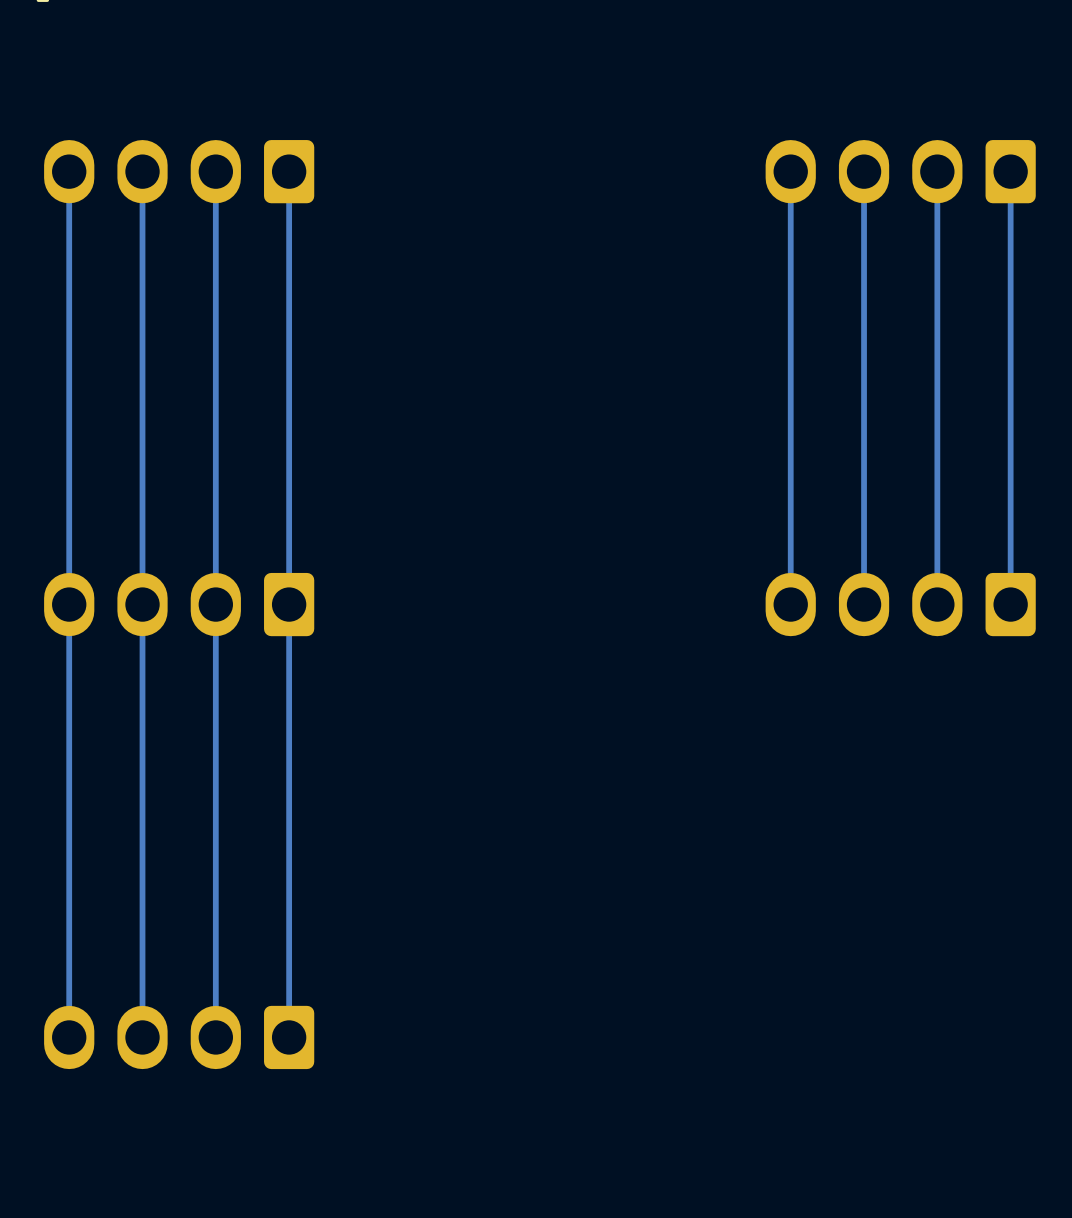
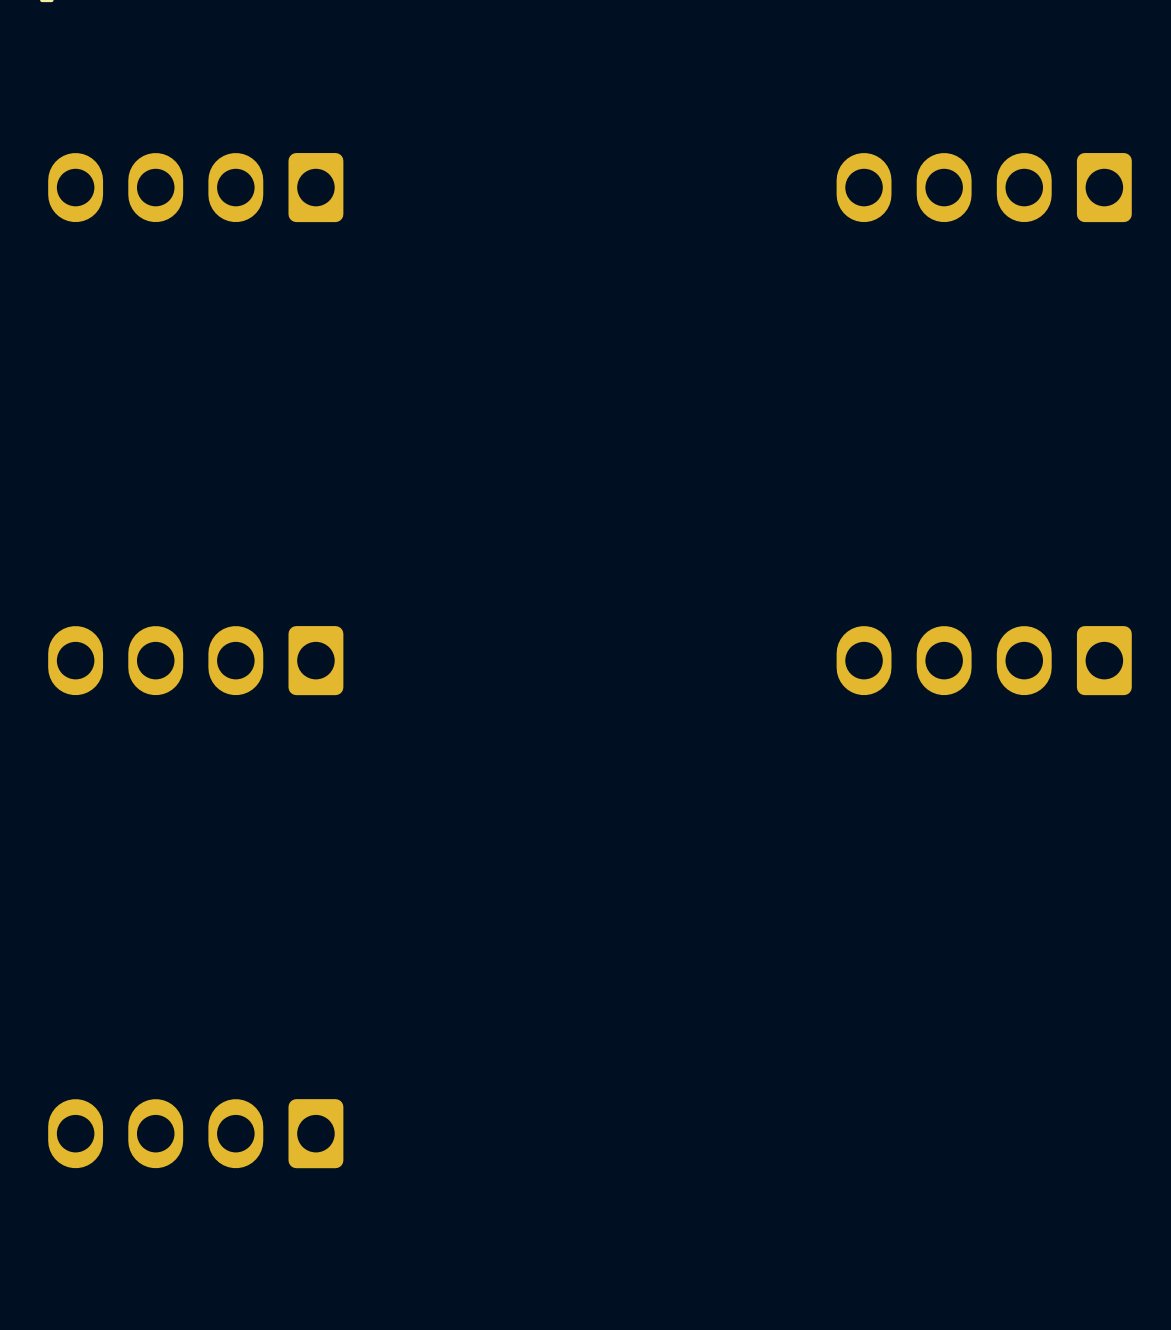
track: (69, 171) (69, 1037) -> none
track: (142, 171) (142, 1037) -> none
track: (215, 171) (215, 1037) -> none
track: (289, 171) (289, 1037) -> none
track: (790, 171) (790, 604) -> none
track: (864, 171) (864, 604) -> none
track: (937, 171) (937, 604) -> none
track: (1010, 171) (1010, 604) -> none

